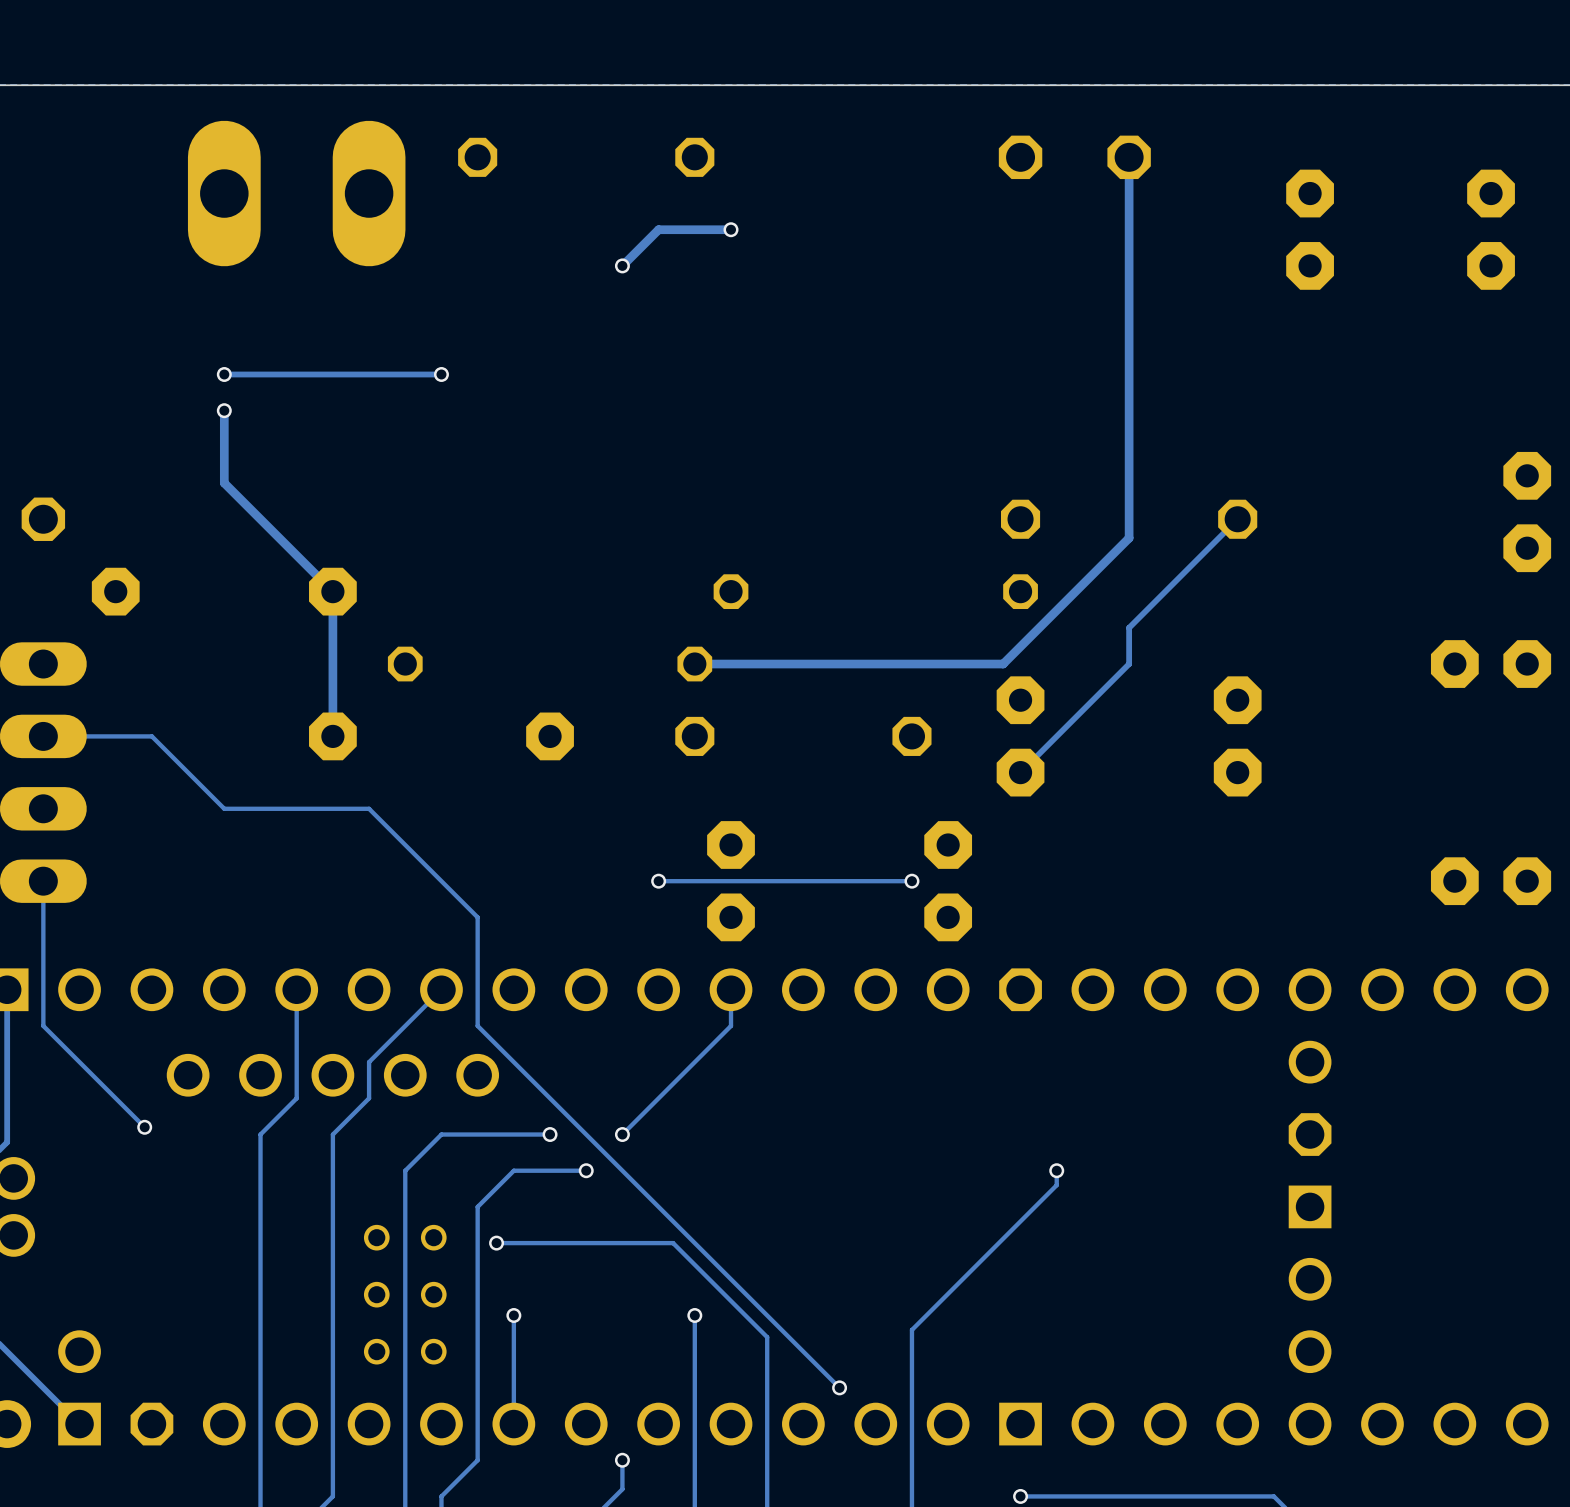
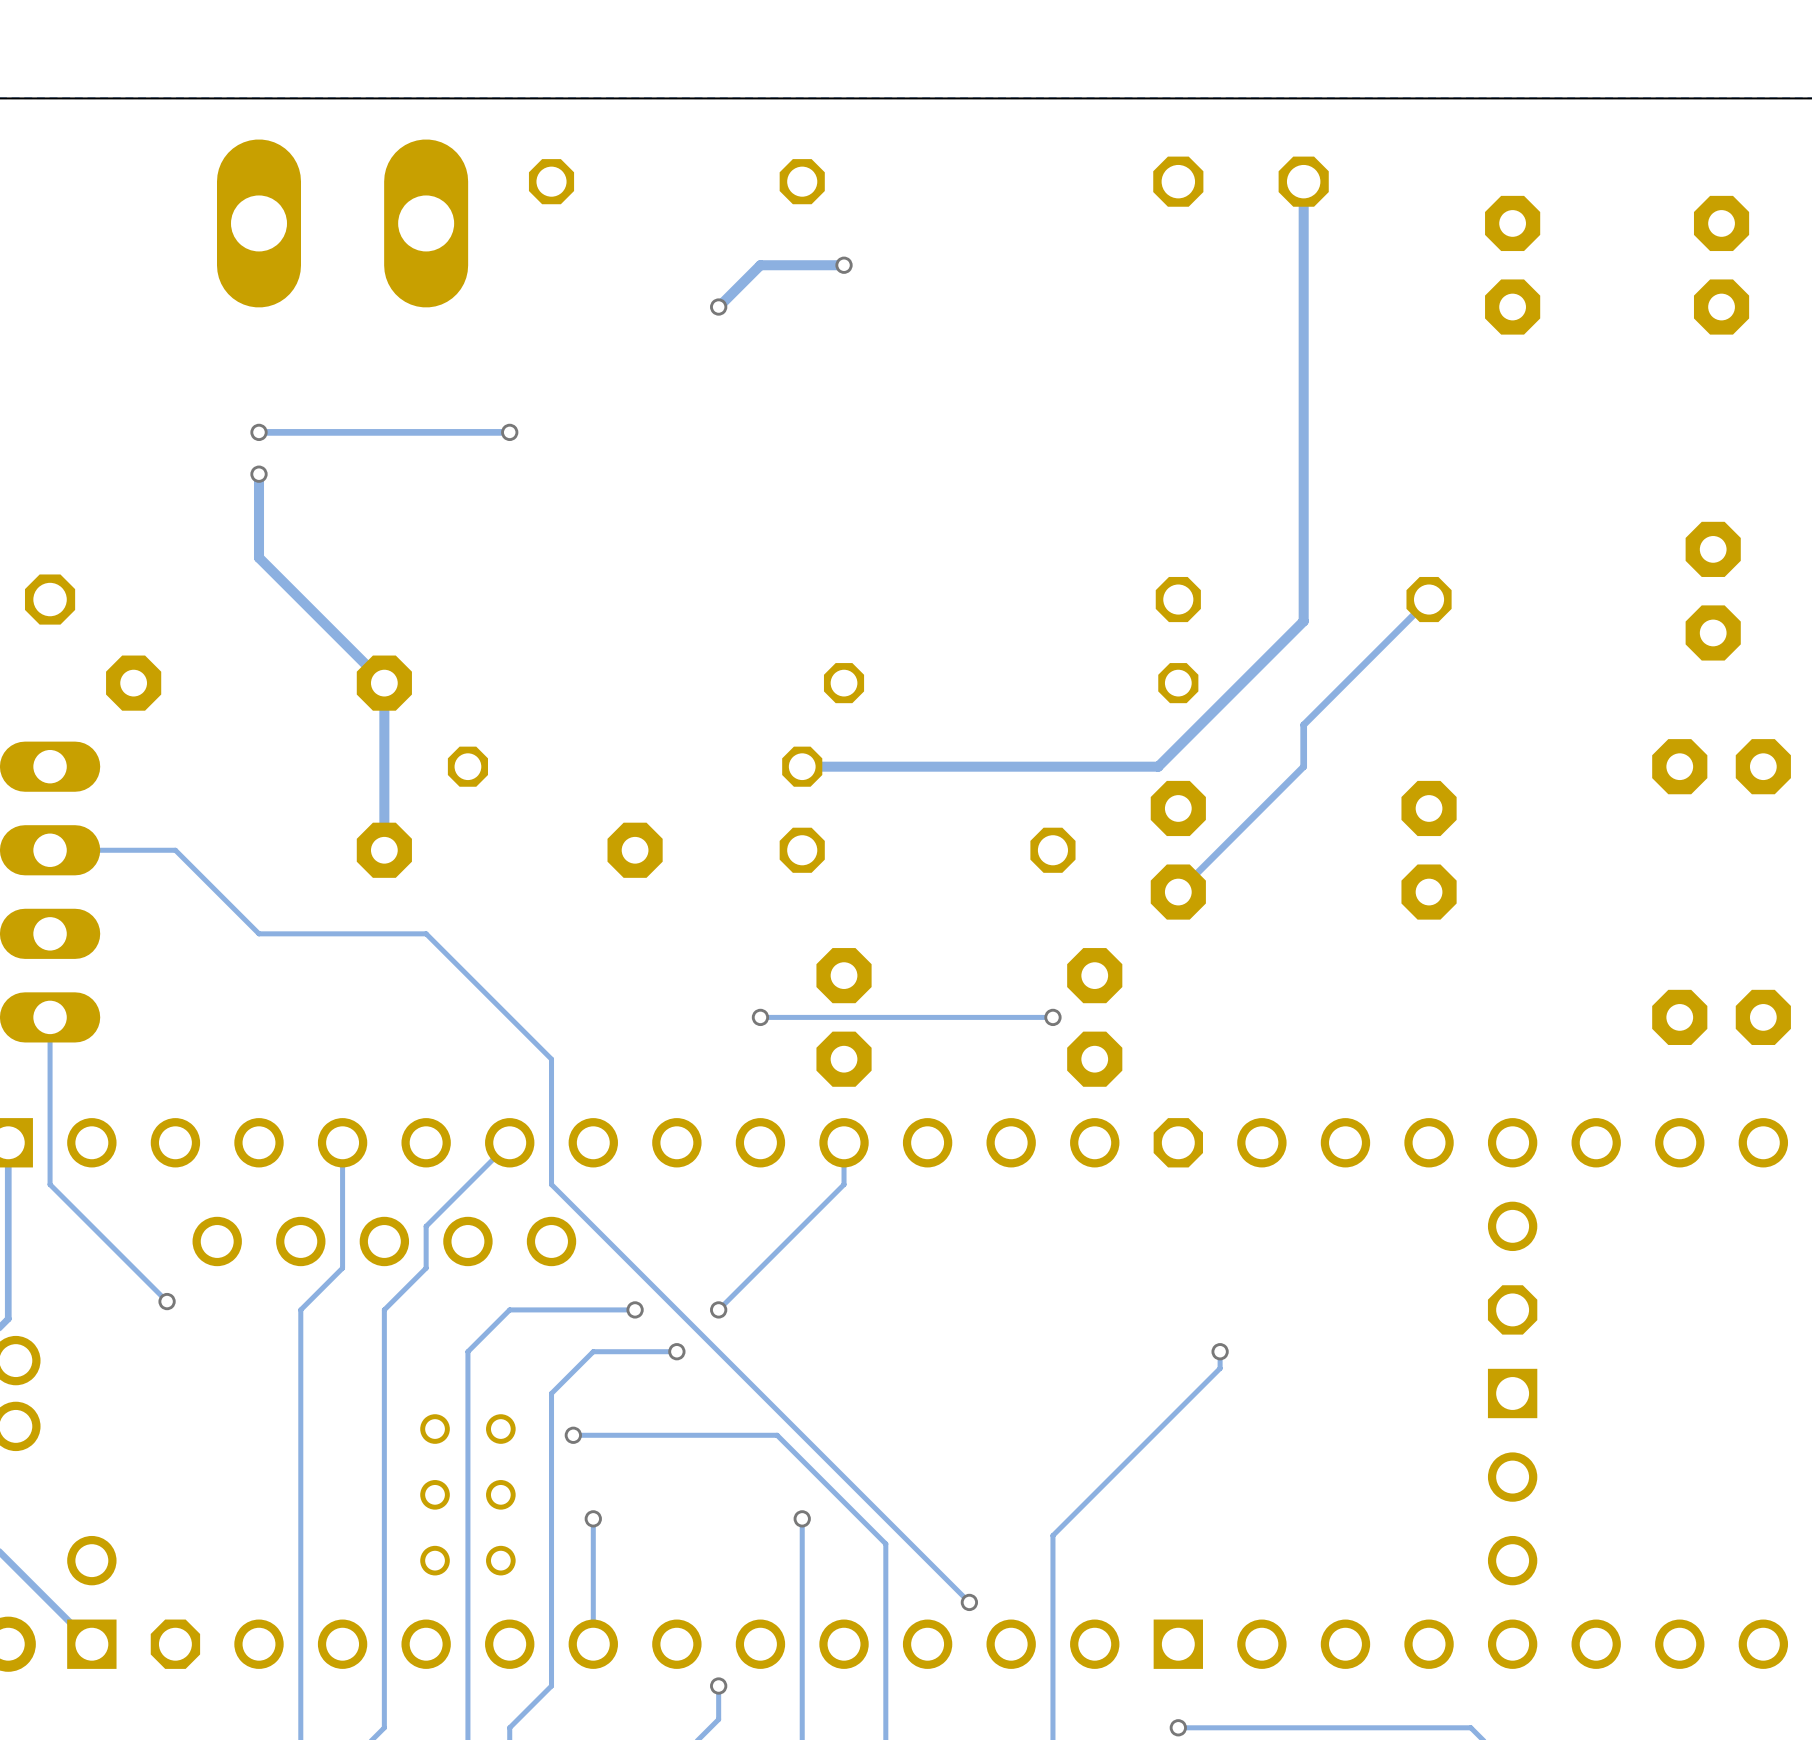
part position: (1527, 512) -> (1713, 591)

